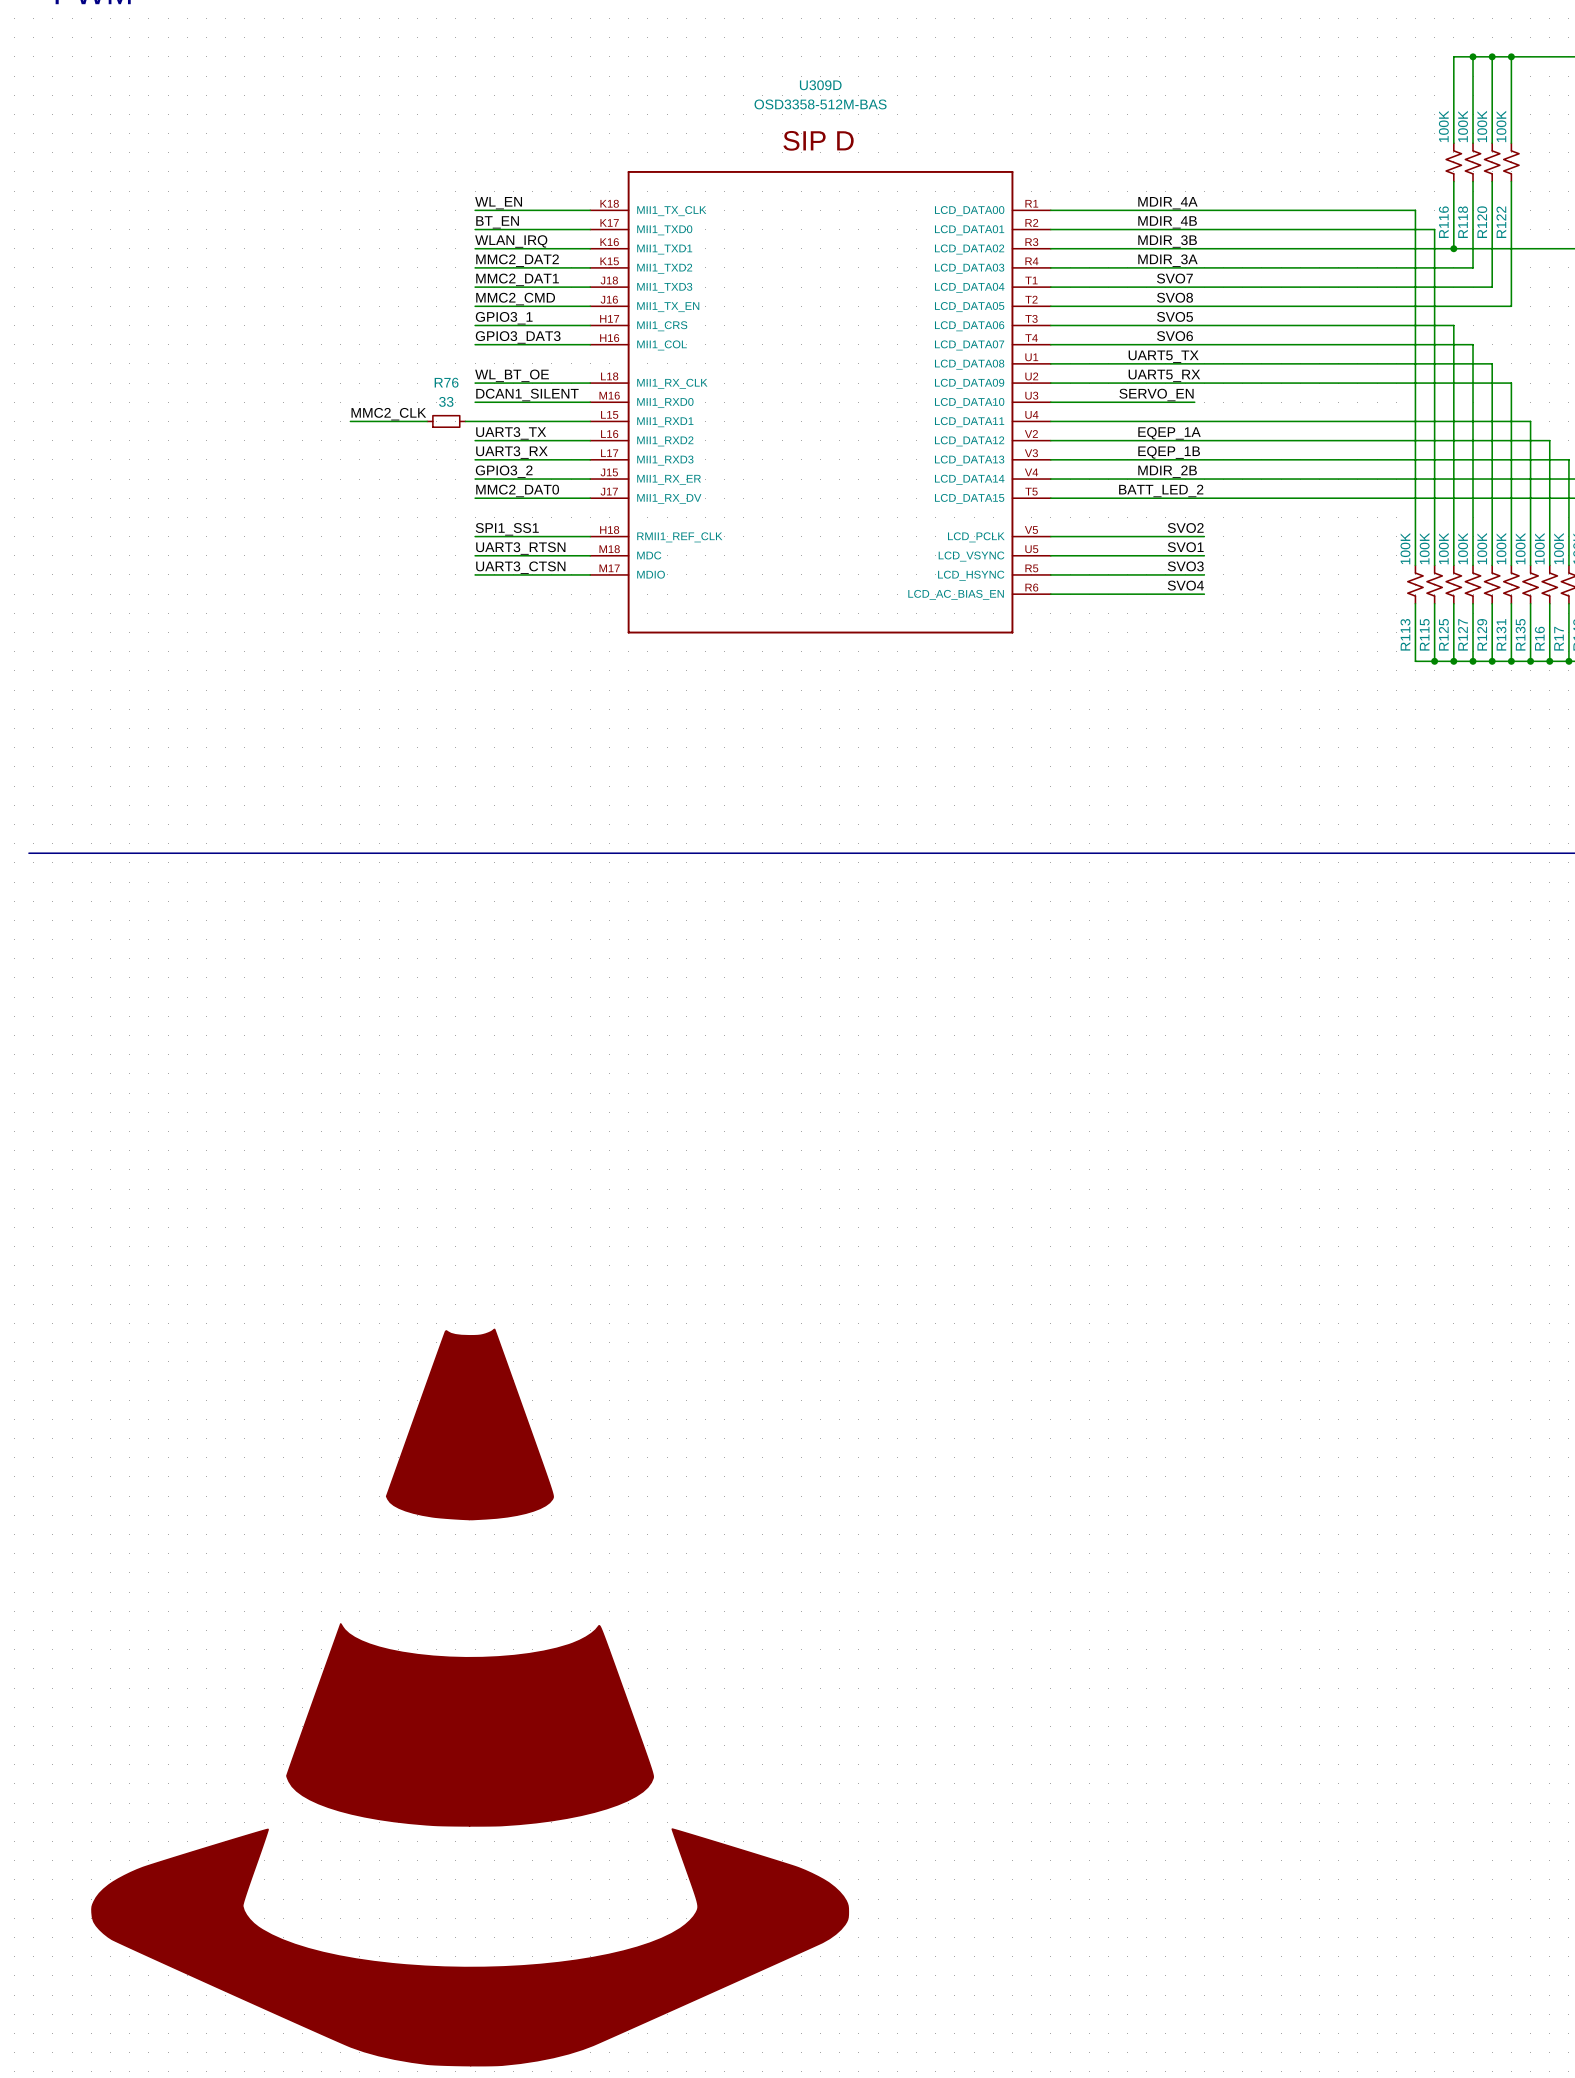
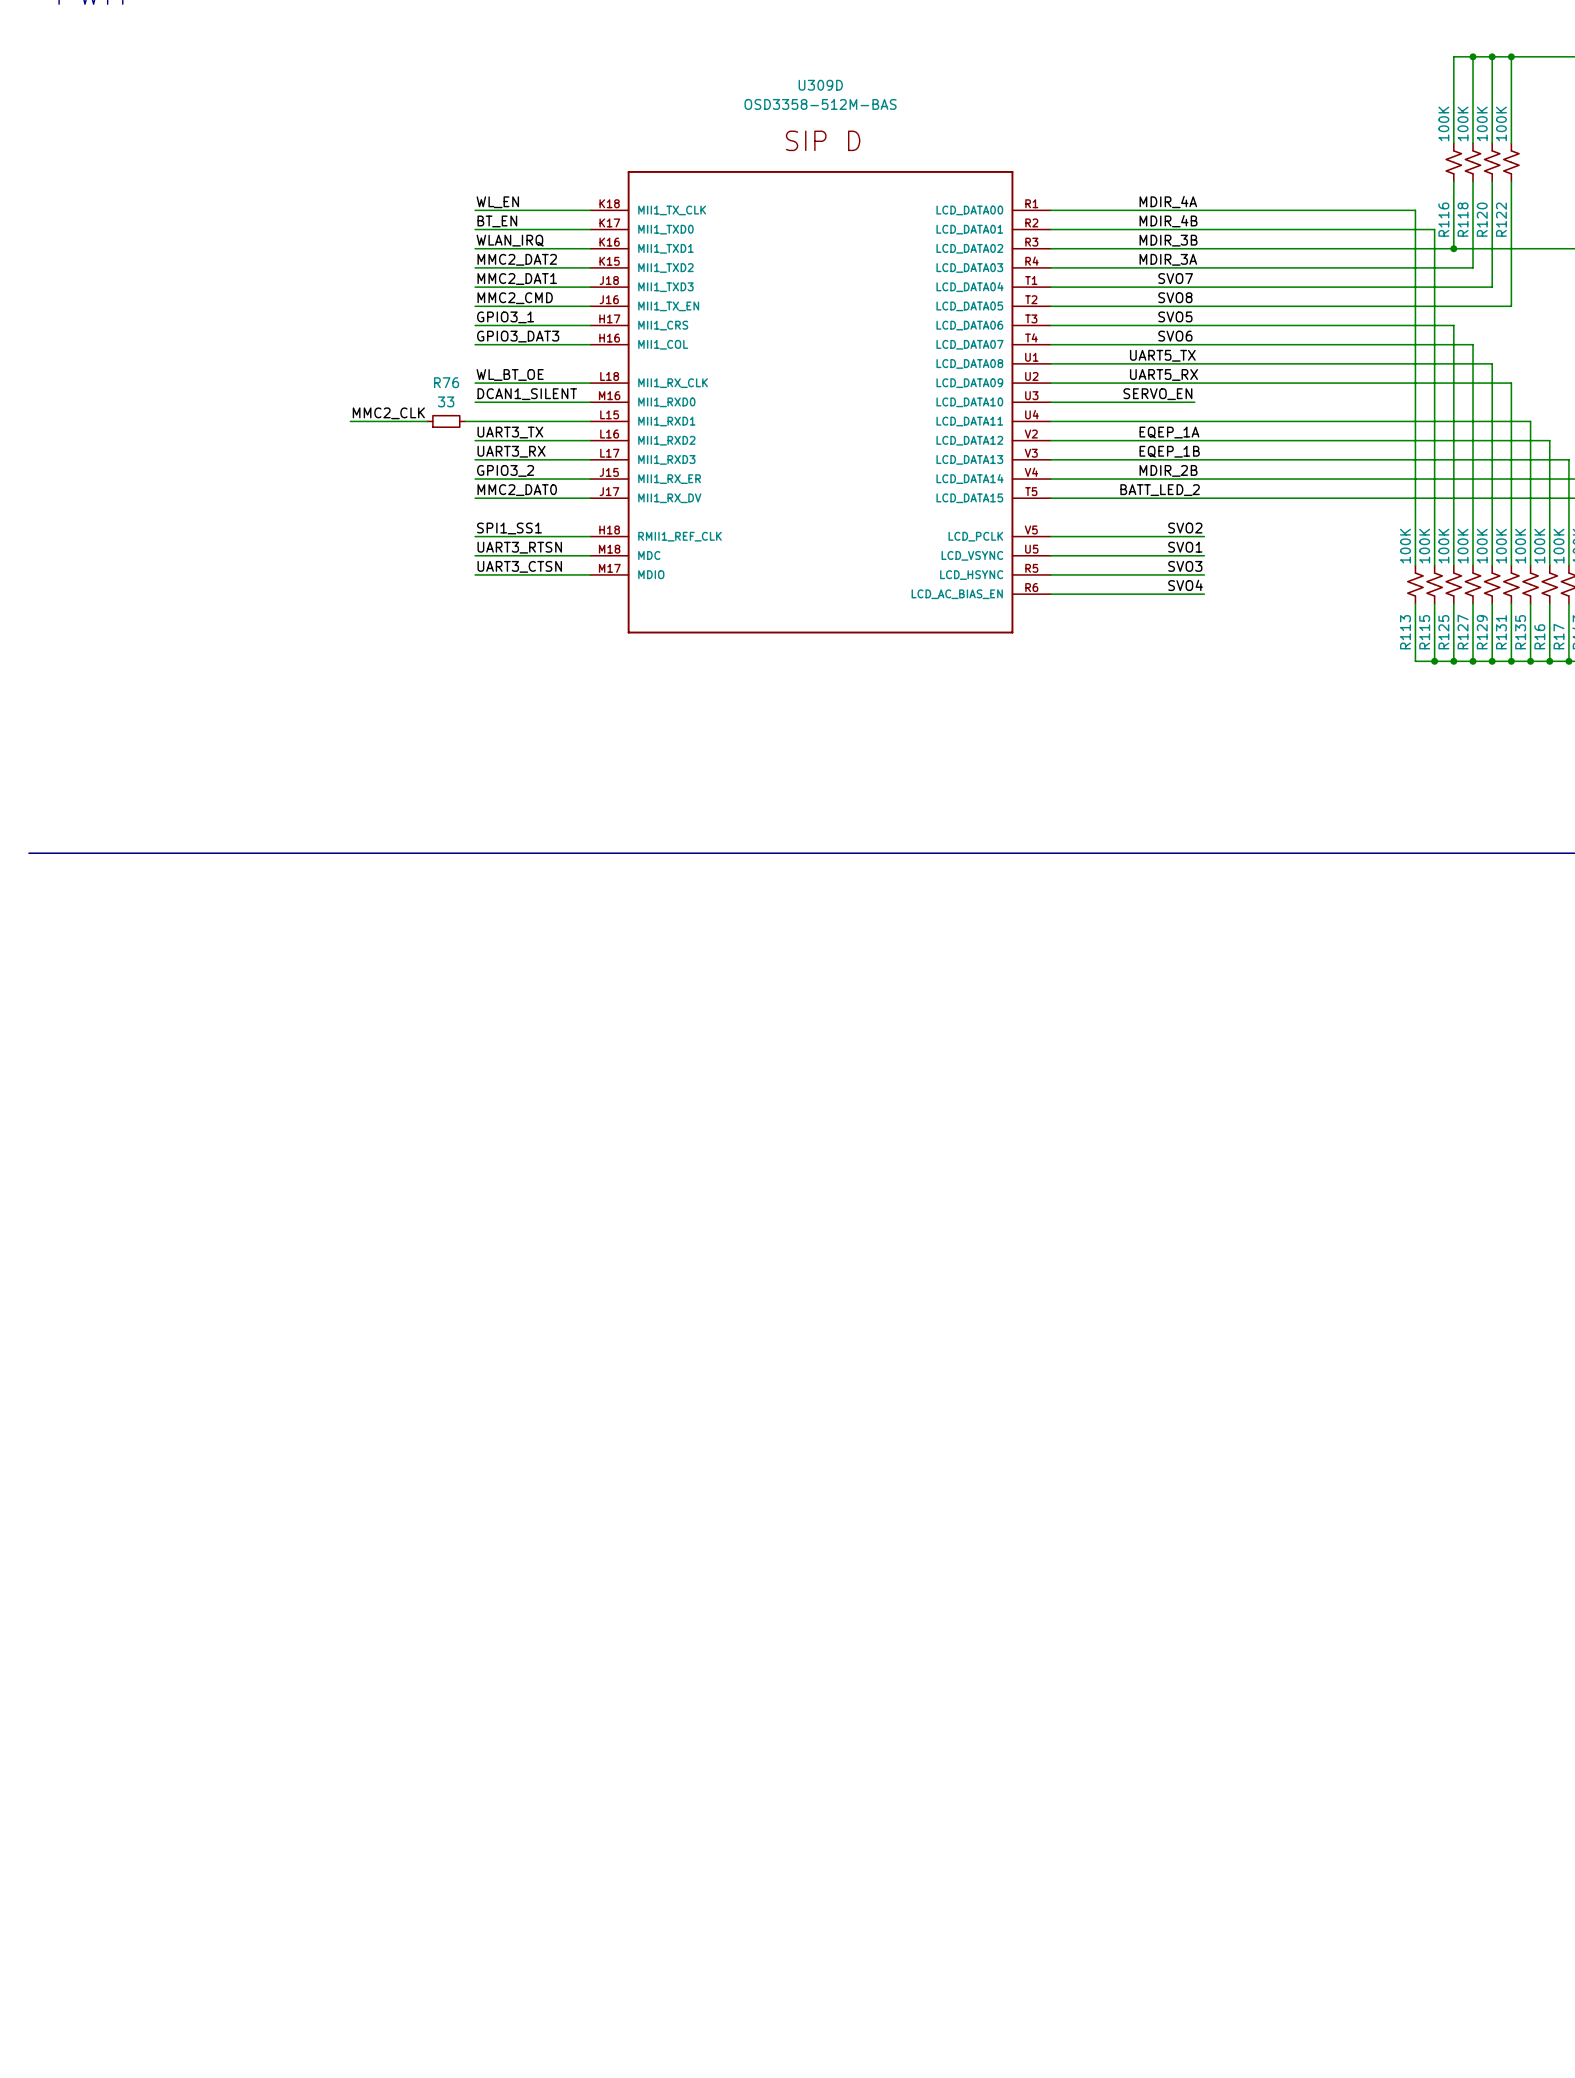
power symbol: (470, 1697) -> none

